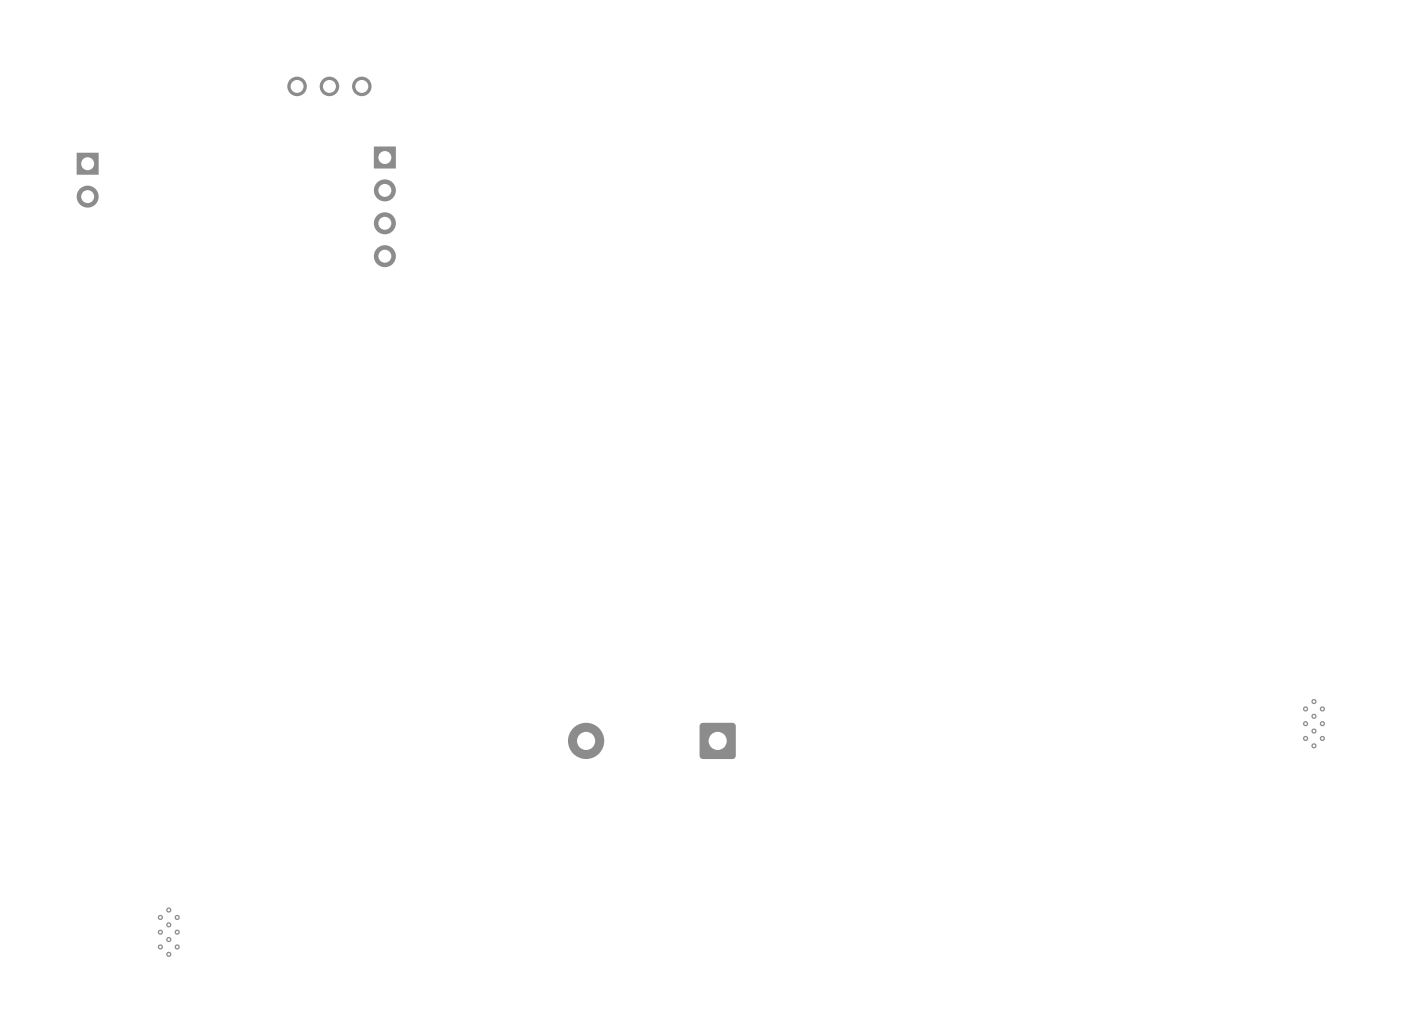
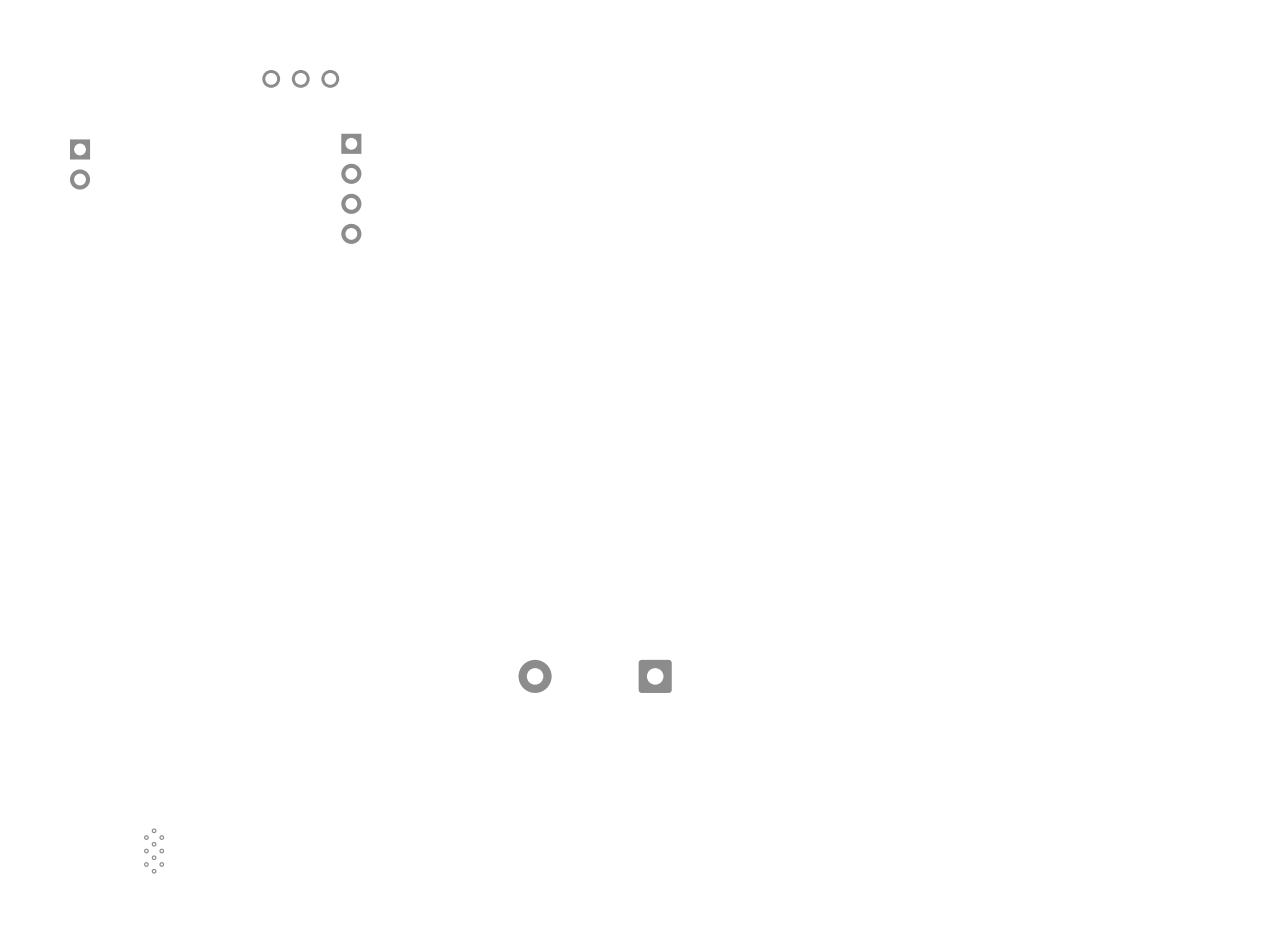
part: (1313, 723) -> none

